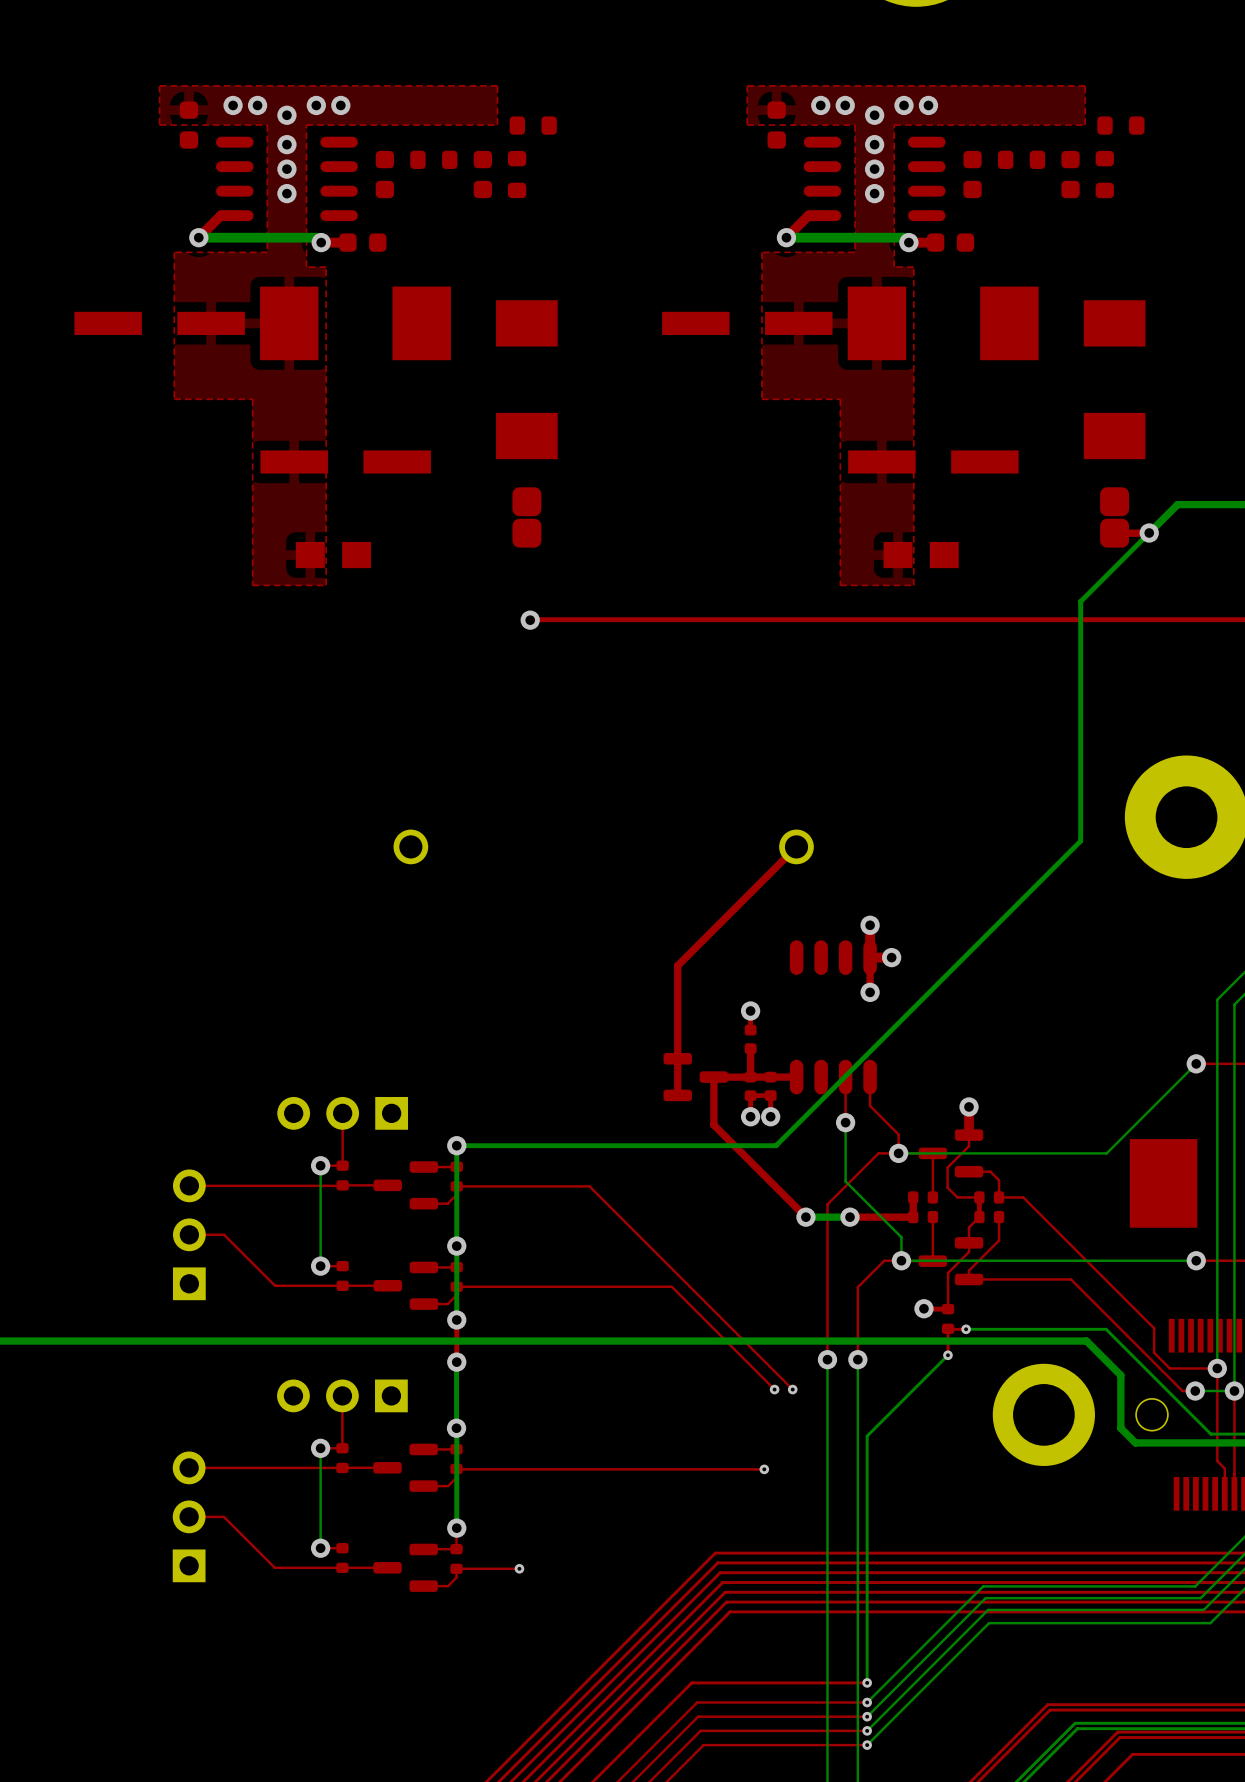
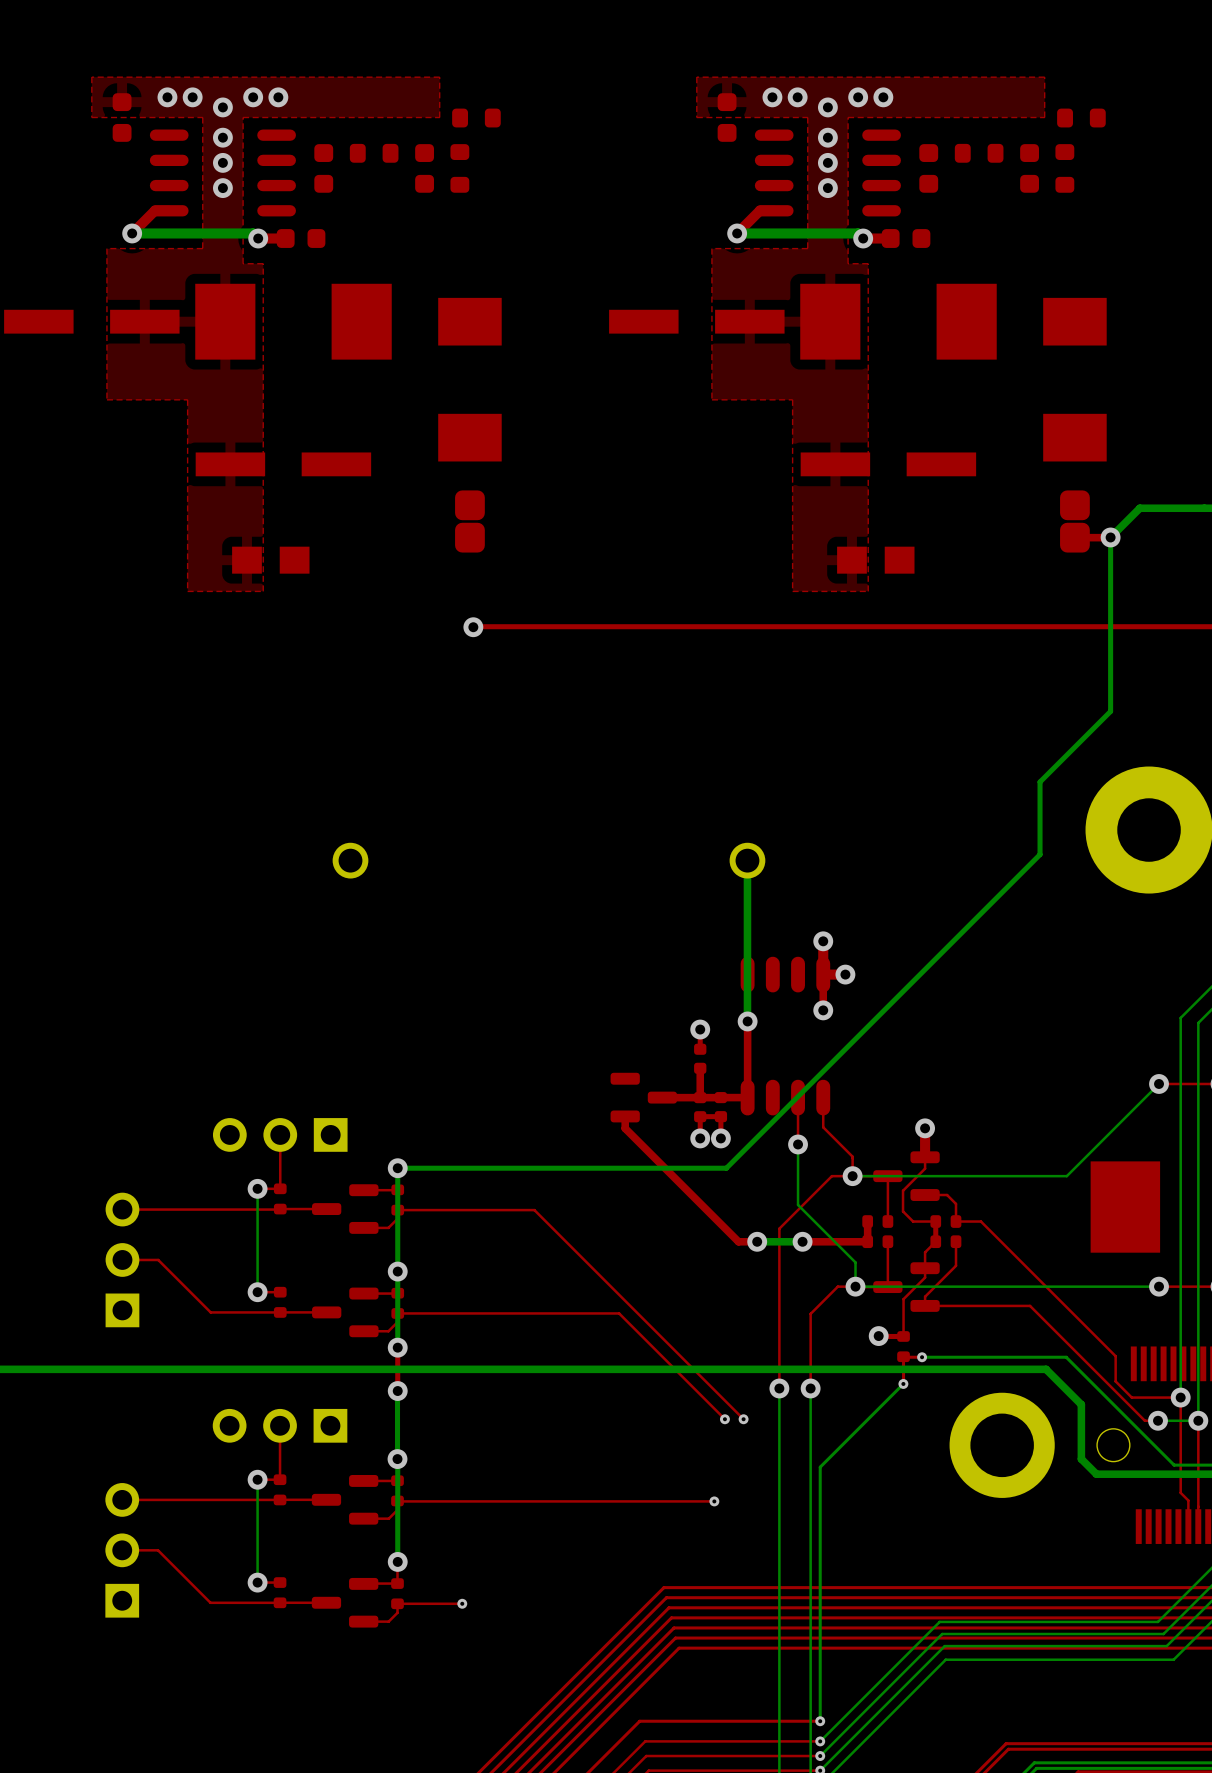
bottom track: (1149, 533) (1080, 601) (1080, 770) -> (1110, 537) (1110, 711) (1040, 781)
top track: (796, 846) (677, 965) (677, 1095) -> none
bottom track: none -> (747, 860) (747, 1021)
top track: none -> (747, 1021) (747, 1097)
via: none -> (747, 1021)
top track: (713, 1077) (713, 1125) (805, 1217) -> (625, 1116) (625, 1128) (738, 1241) (757, 1241)

